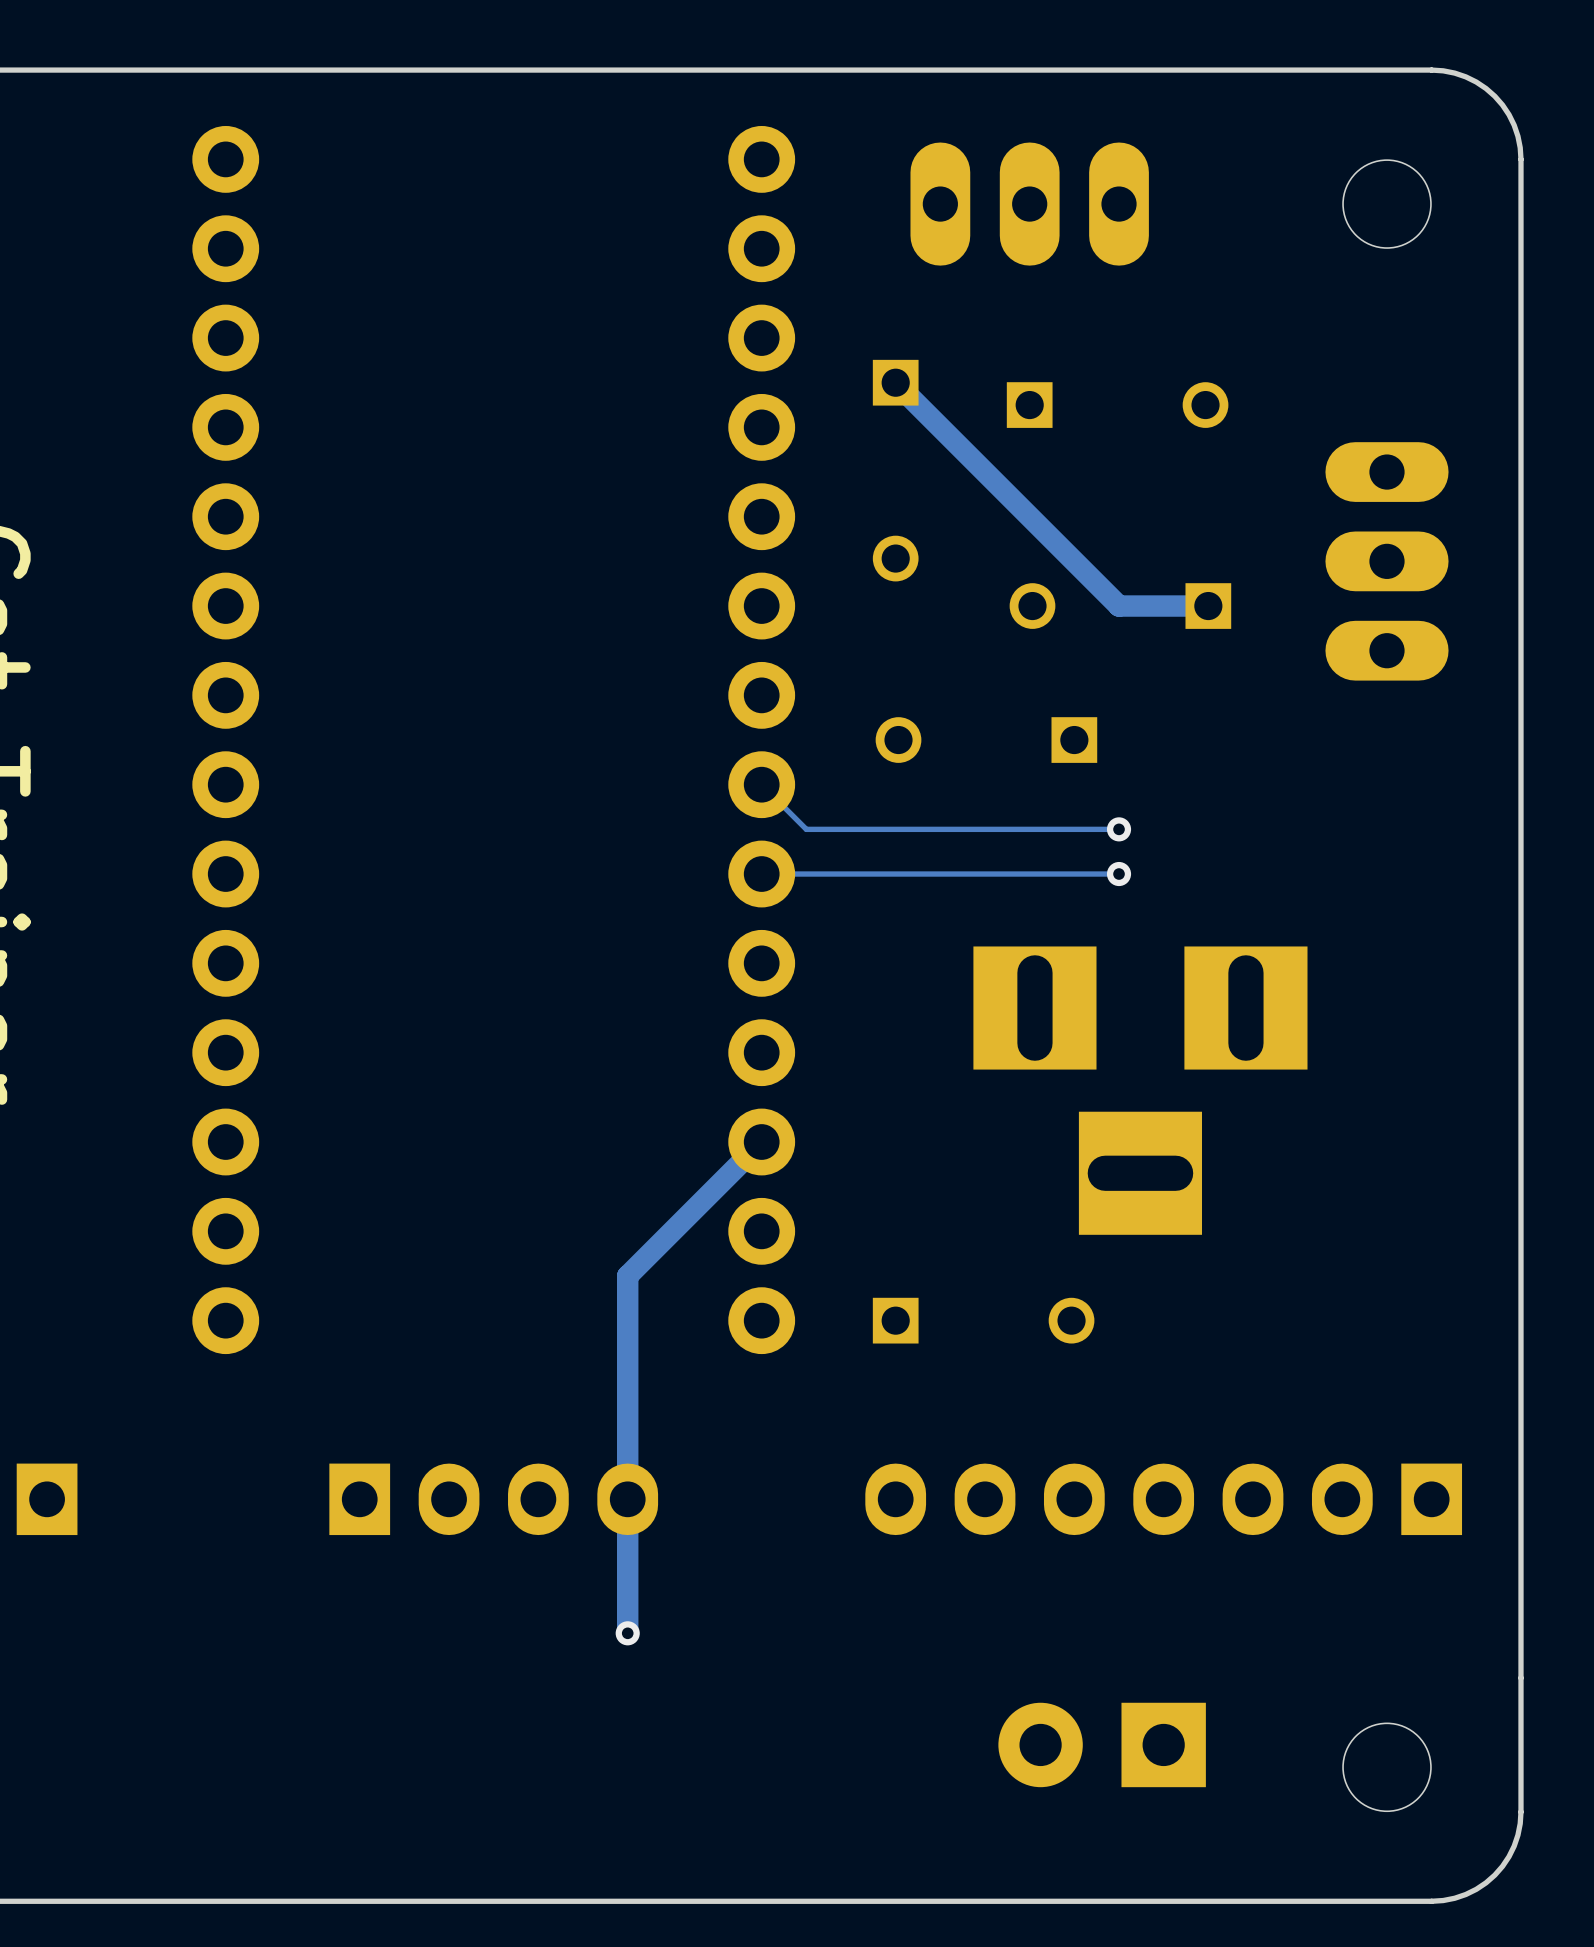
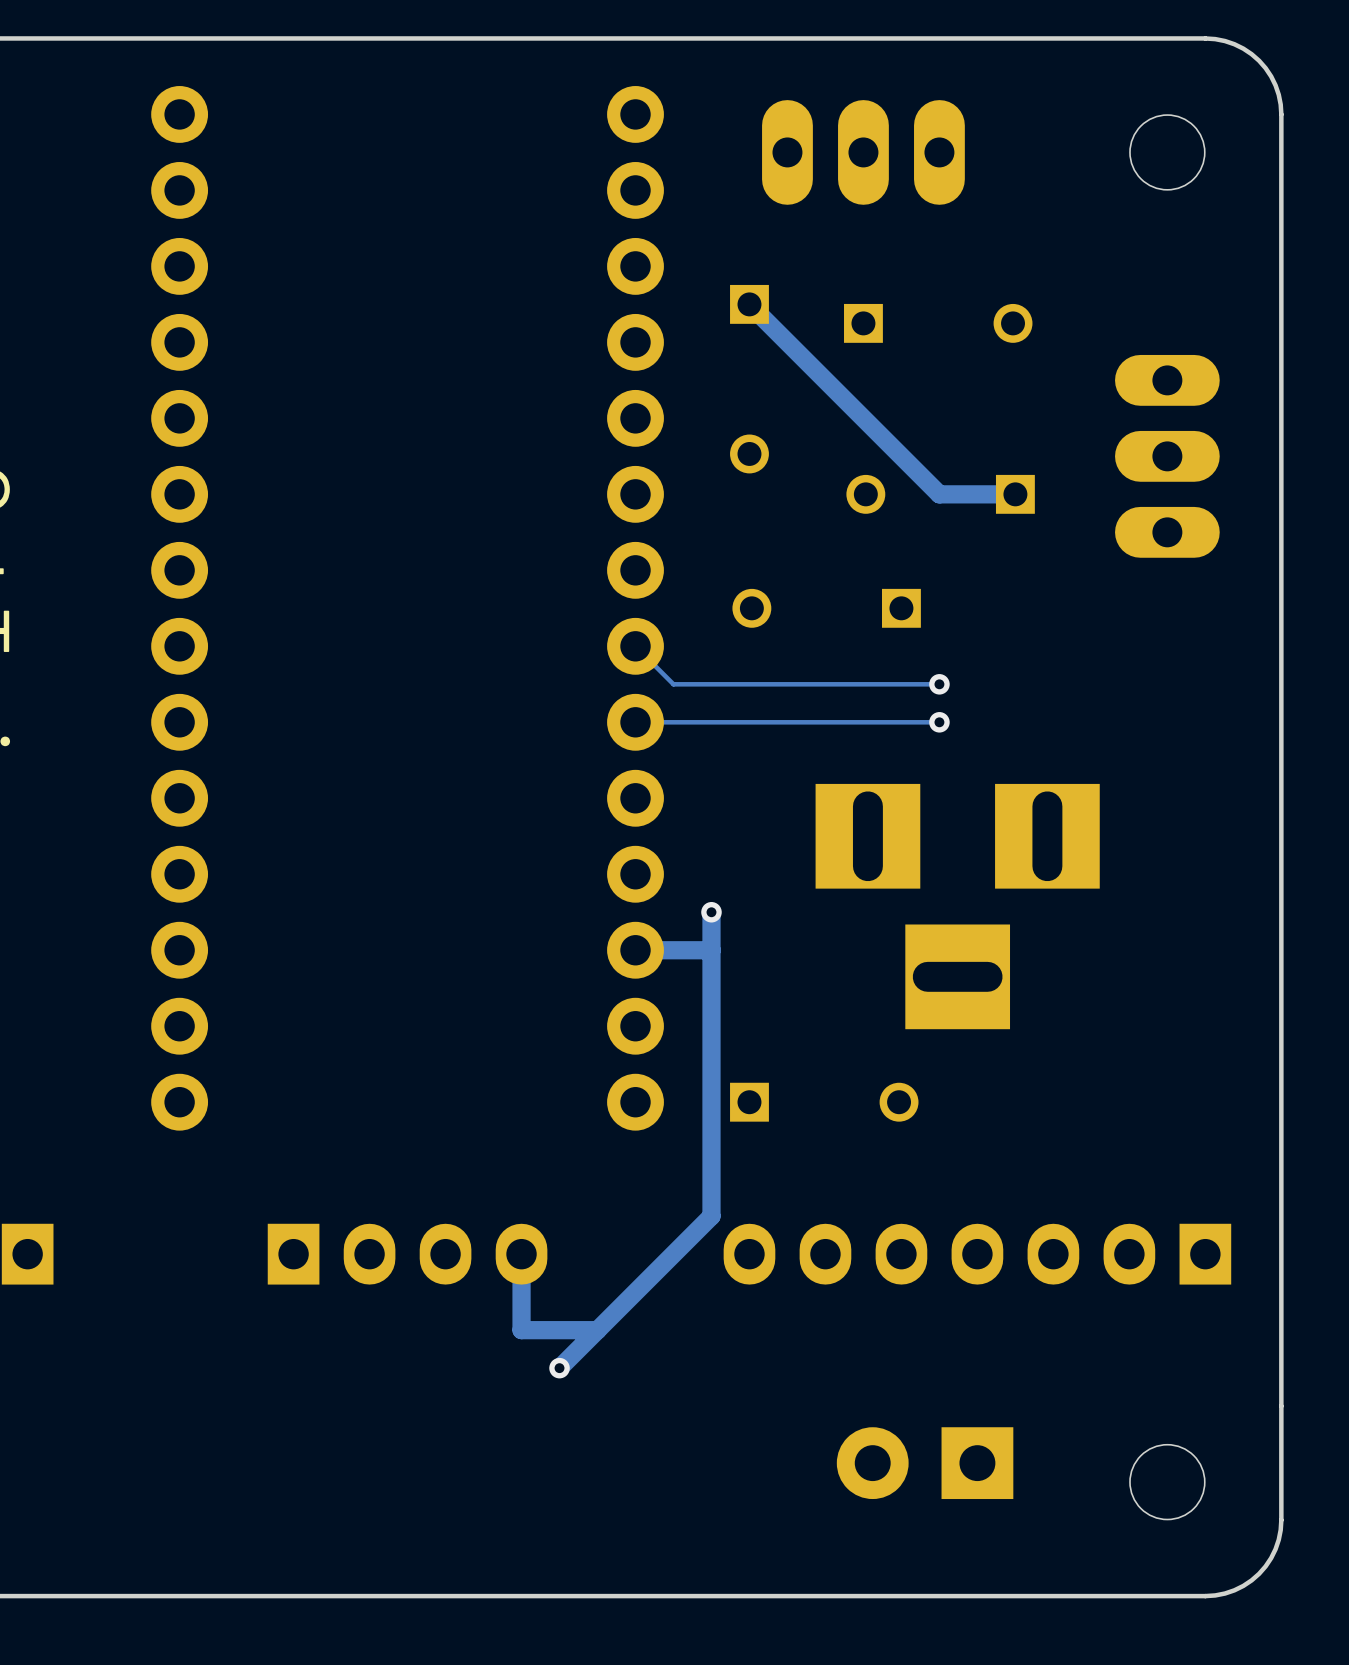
track: none -> (711, 912) (711, 1216) (559, 1368)
via: none -> (711, 912)
track: (761, 1142) (627, 1276) (627, 1499) -> (635, 950) (711, 950)
track: (627, 1588) (627, 1633) -> (521, 1330) (597, 1330)
via position: (627, 1633) -> (559, 1368)

